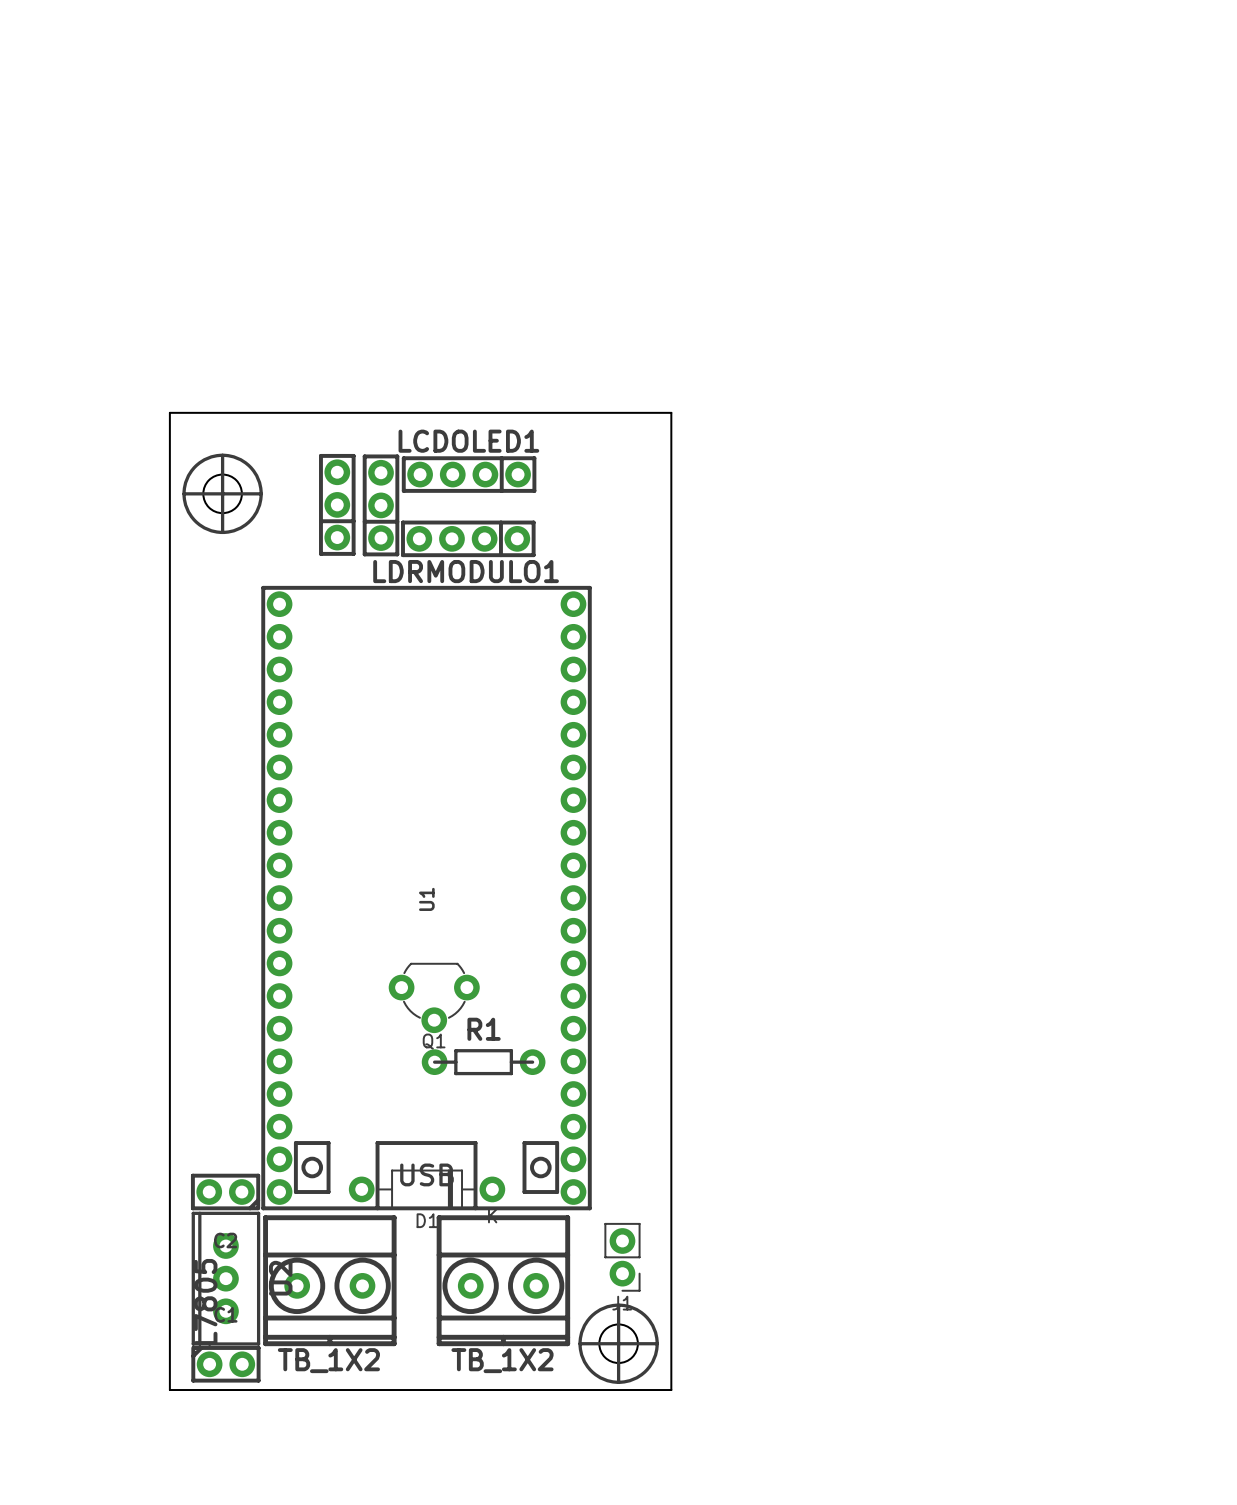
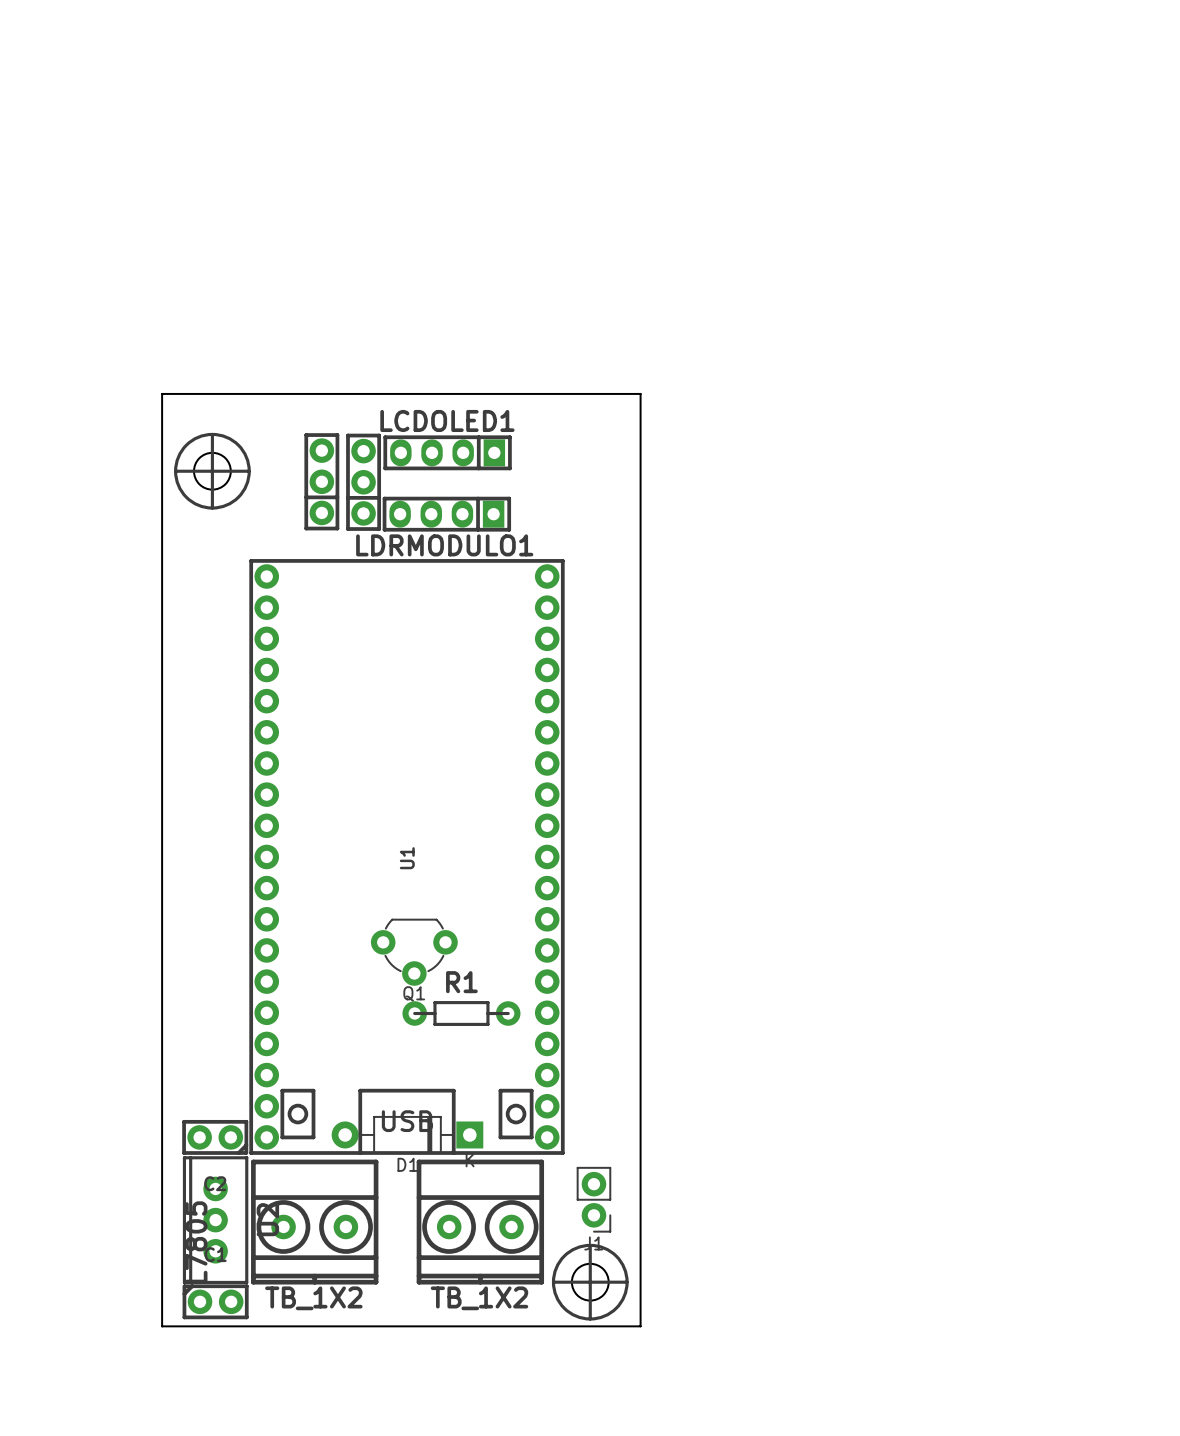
LCDOLED1 footprint: [401, 456, 537, 493] -> [383, 435, 512, 471]
LDRMODULO1 footprint: [401, 520, 536, 558] -> [382, 496, 512, 532]
D1 footprint: [348, 1169, 506, 1210] -> [331, 1116, 484, 1154]

